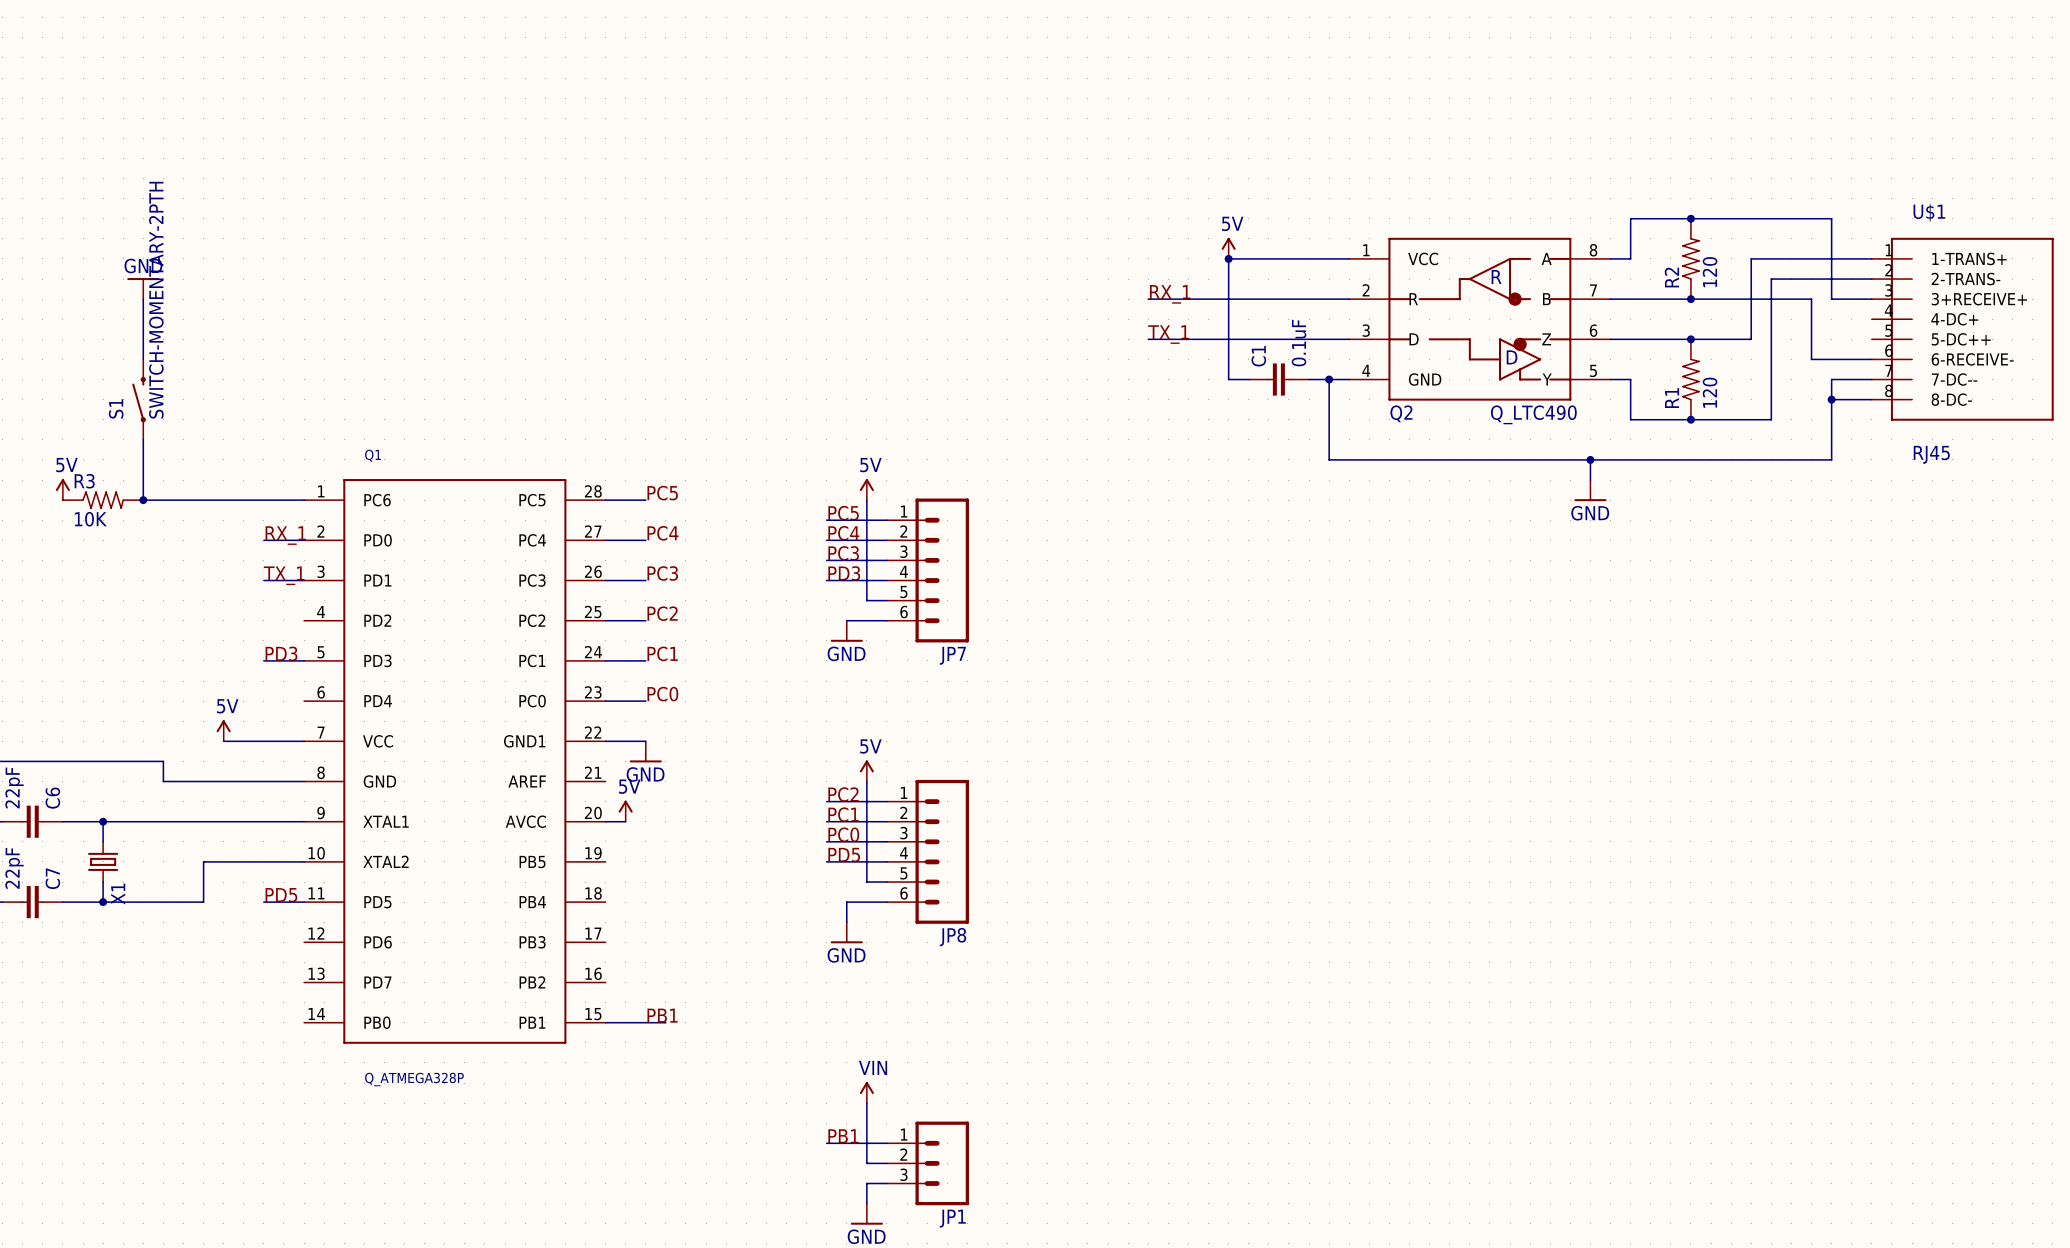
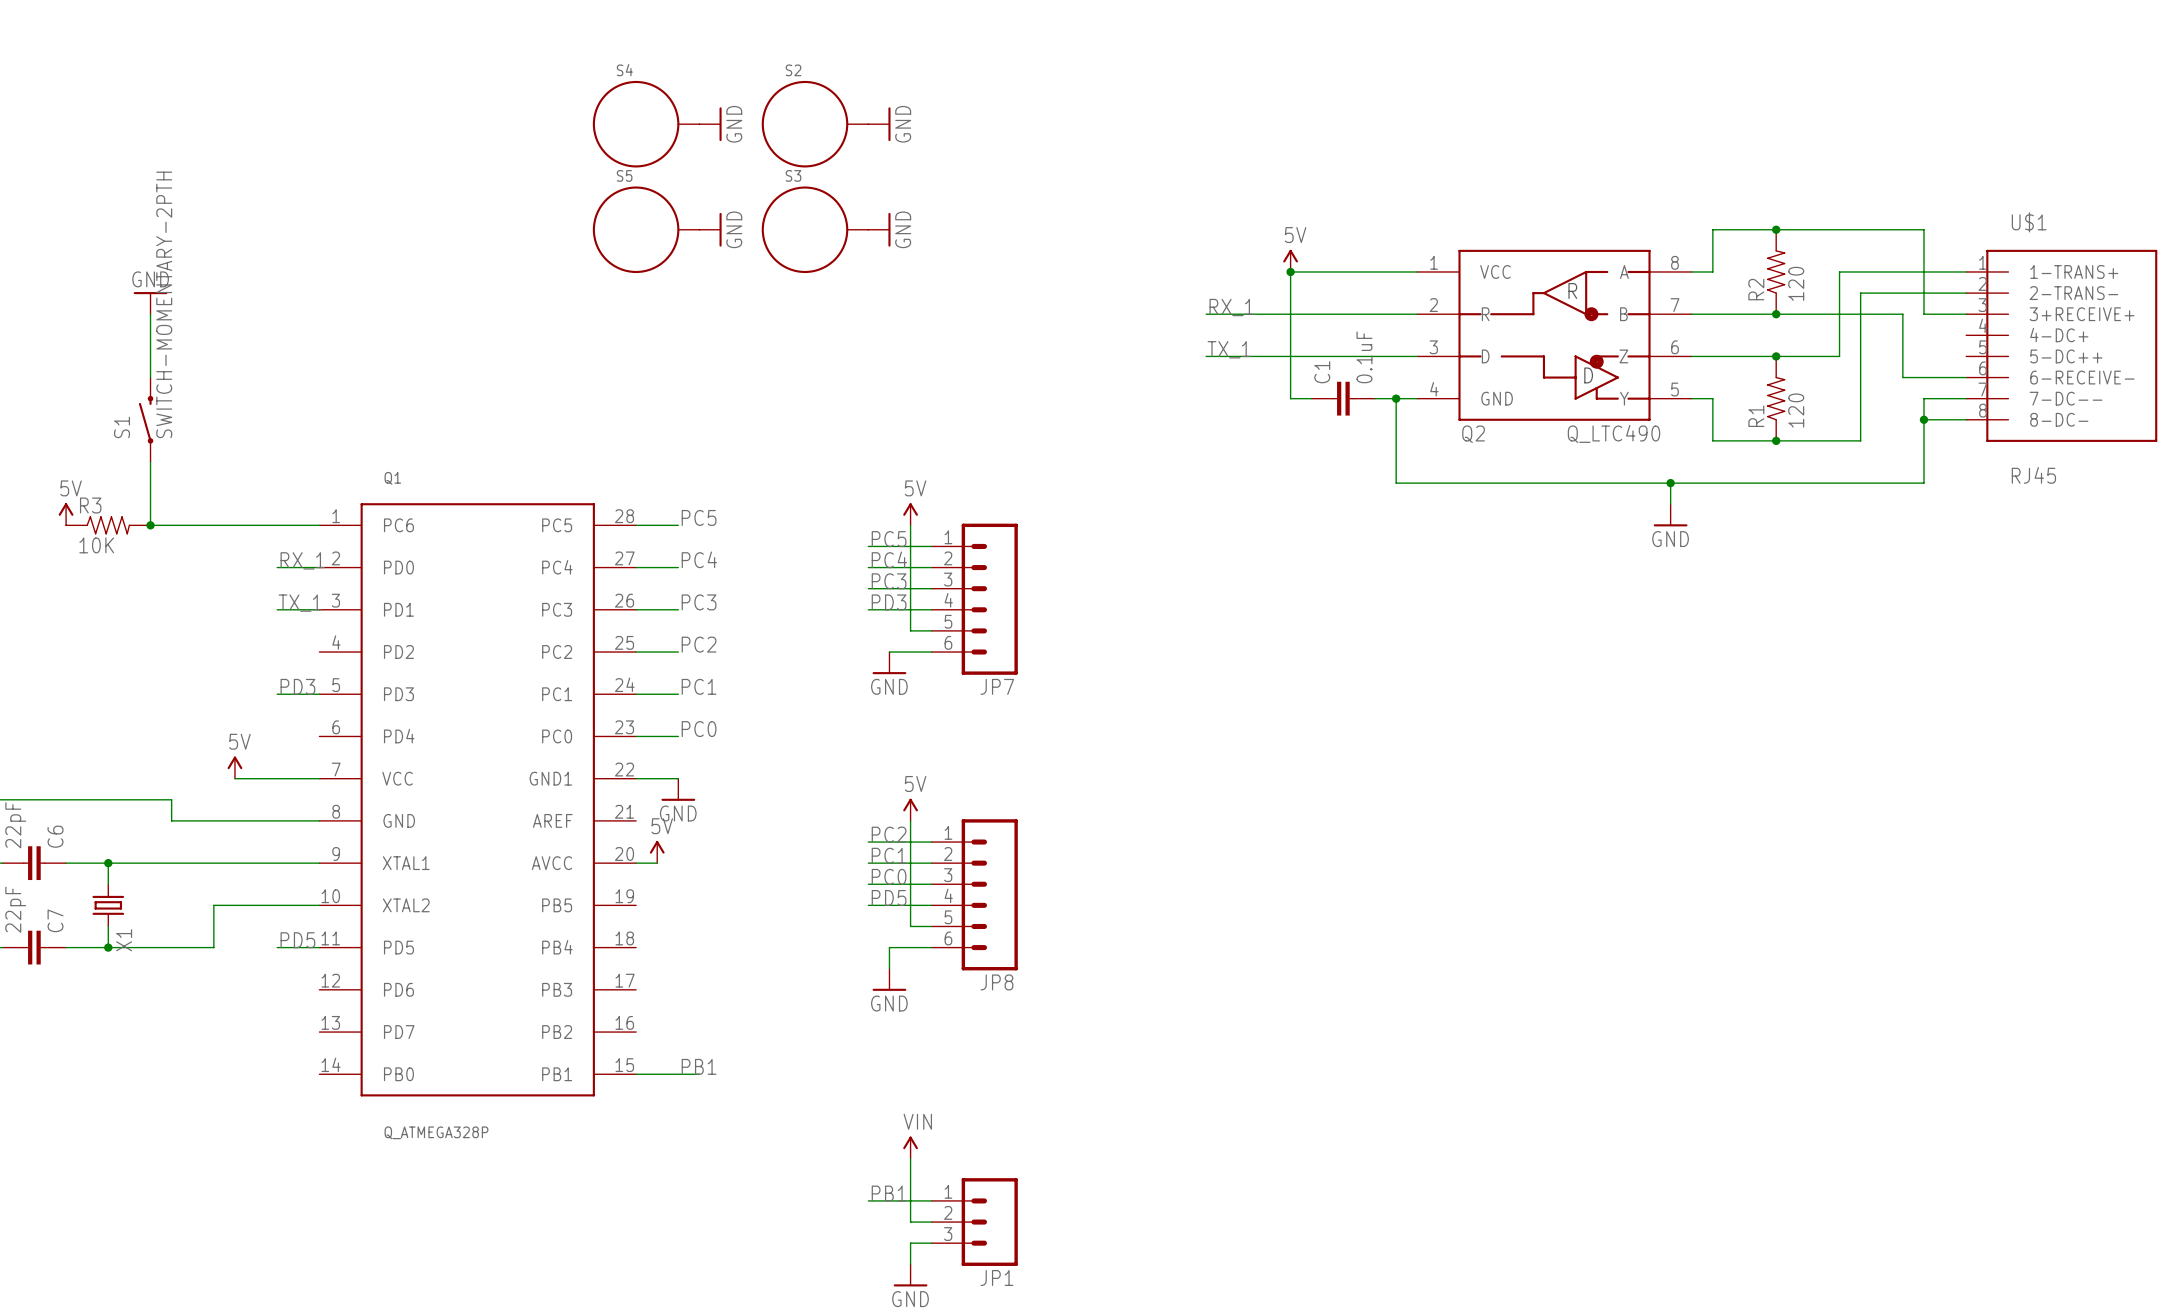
S4: none -> (646, 124)
power symbol: none -> GND (710, 124)
S2: none -> (815, 124)
power symbol: none -> GND (879, 124)
S5: none -> (646, 229)
power symbol: none -> GND (710, 229)
S3: none -> (815, 229)
power symbol: none -> GND (879, 229)

